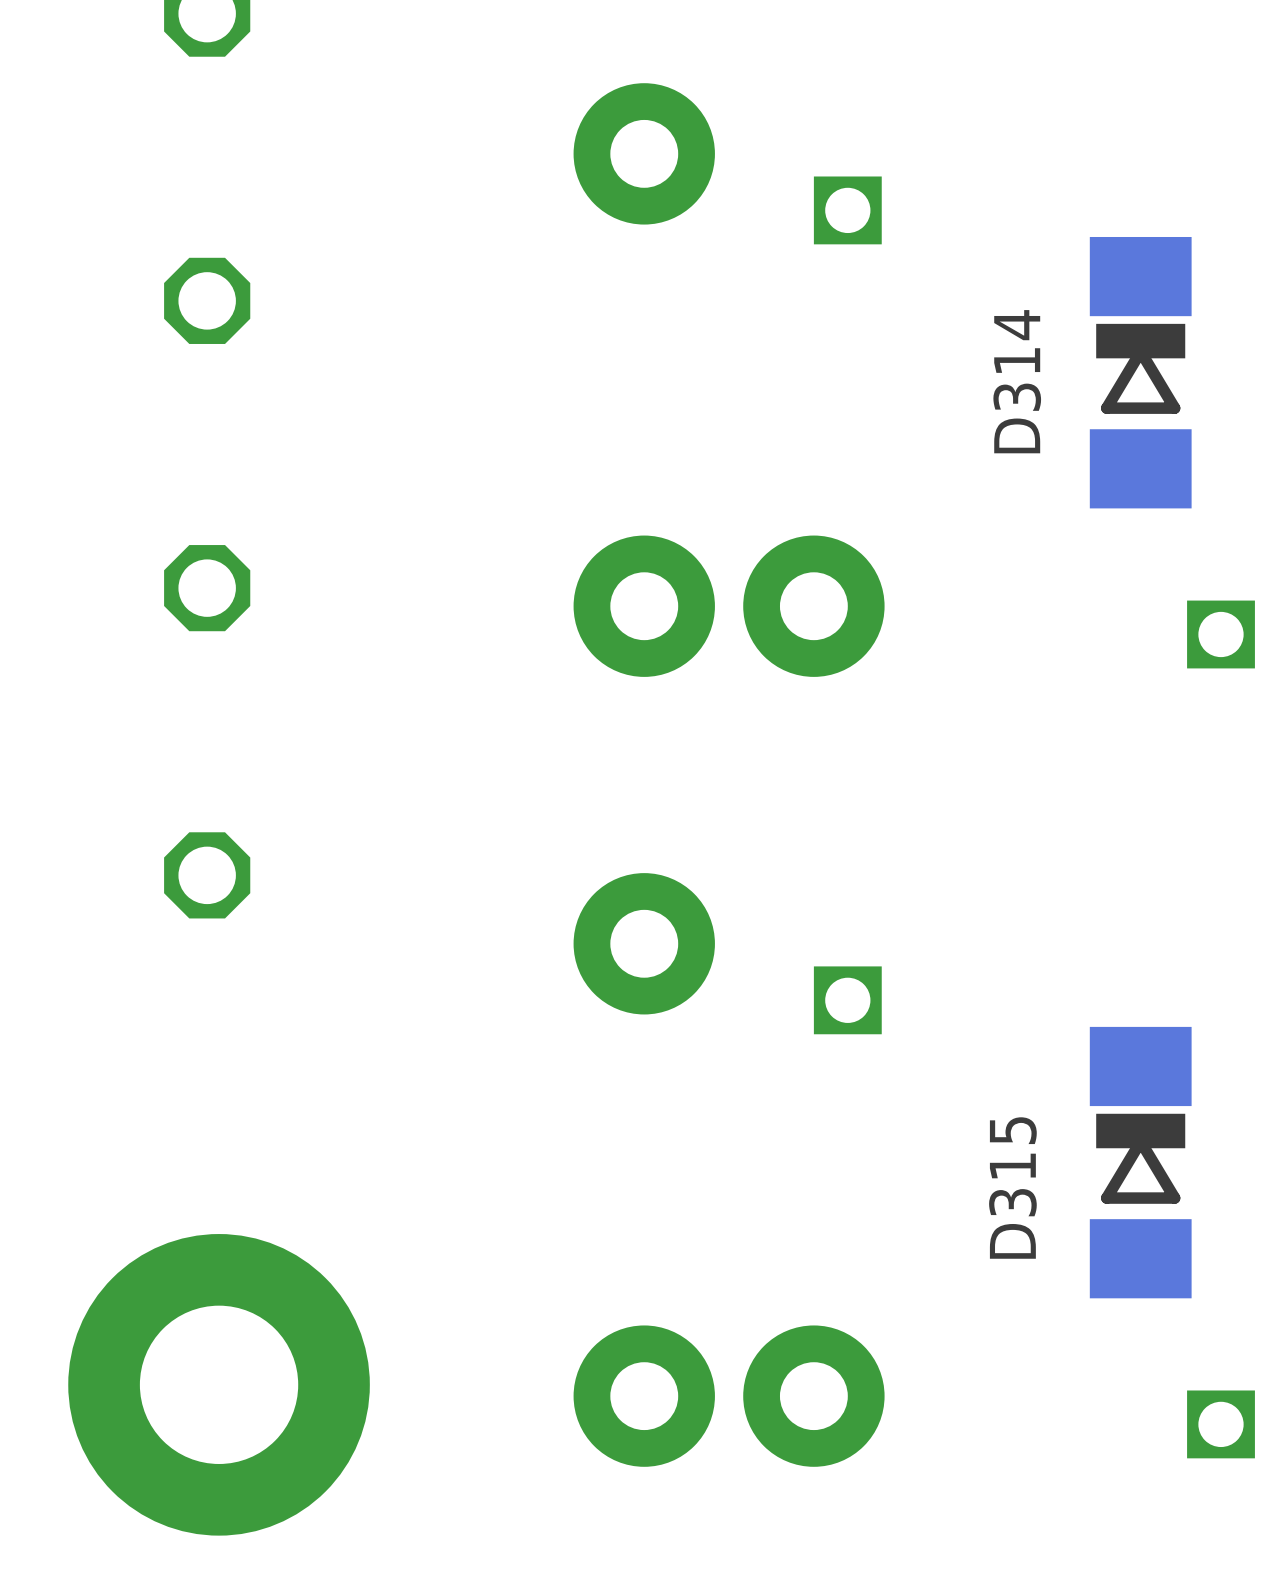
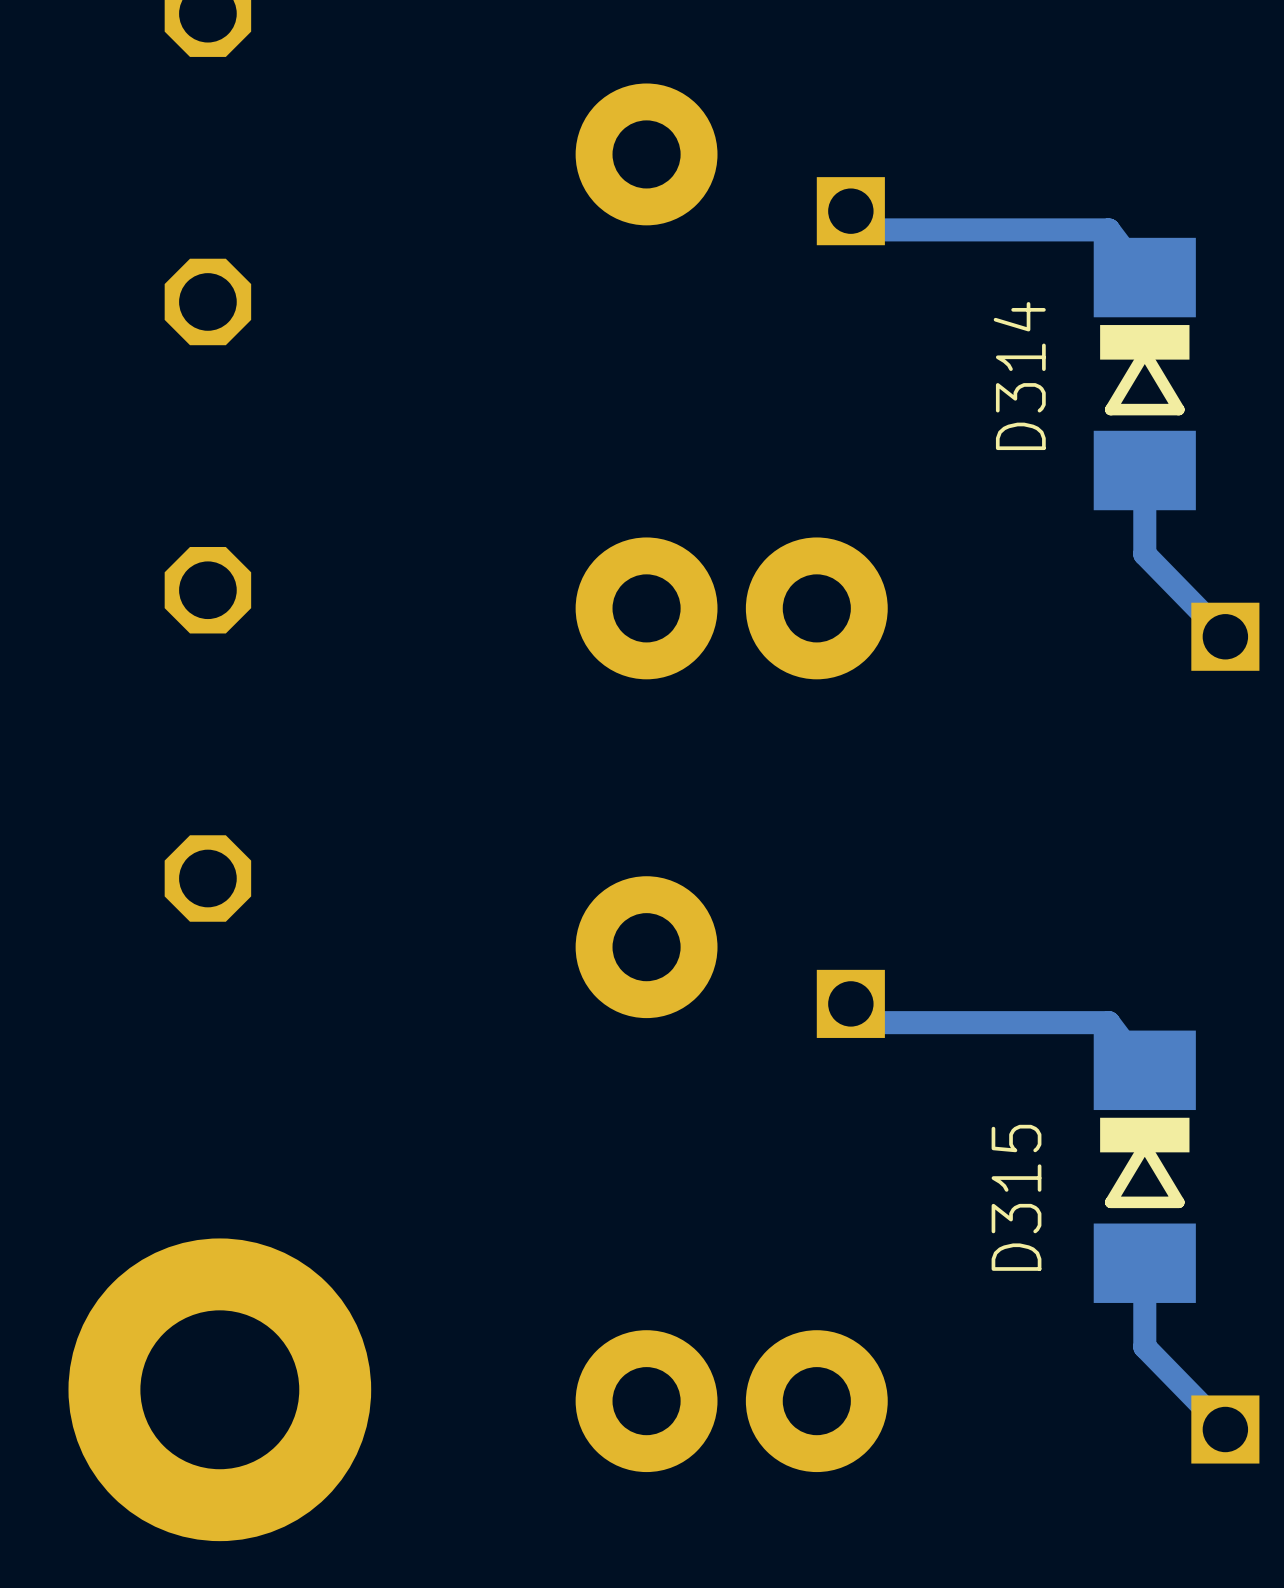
track: none -> (850, 211) (856, 229) (1108, 229) (1144, 277)
track: none -> (1144, 470) (1144, 554) (1225, 636)
track: none -> (850, 1003) (856, 1022) (1108, 1022) (1144, 1070)
track: none -> (1144, 1263) (1144, 1346) (1225, 1429)

